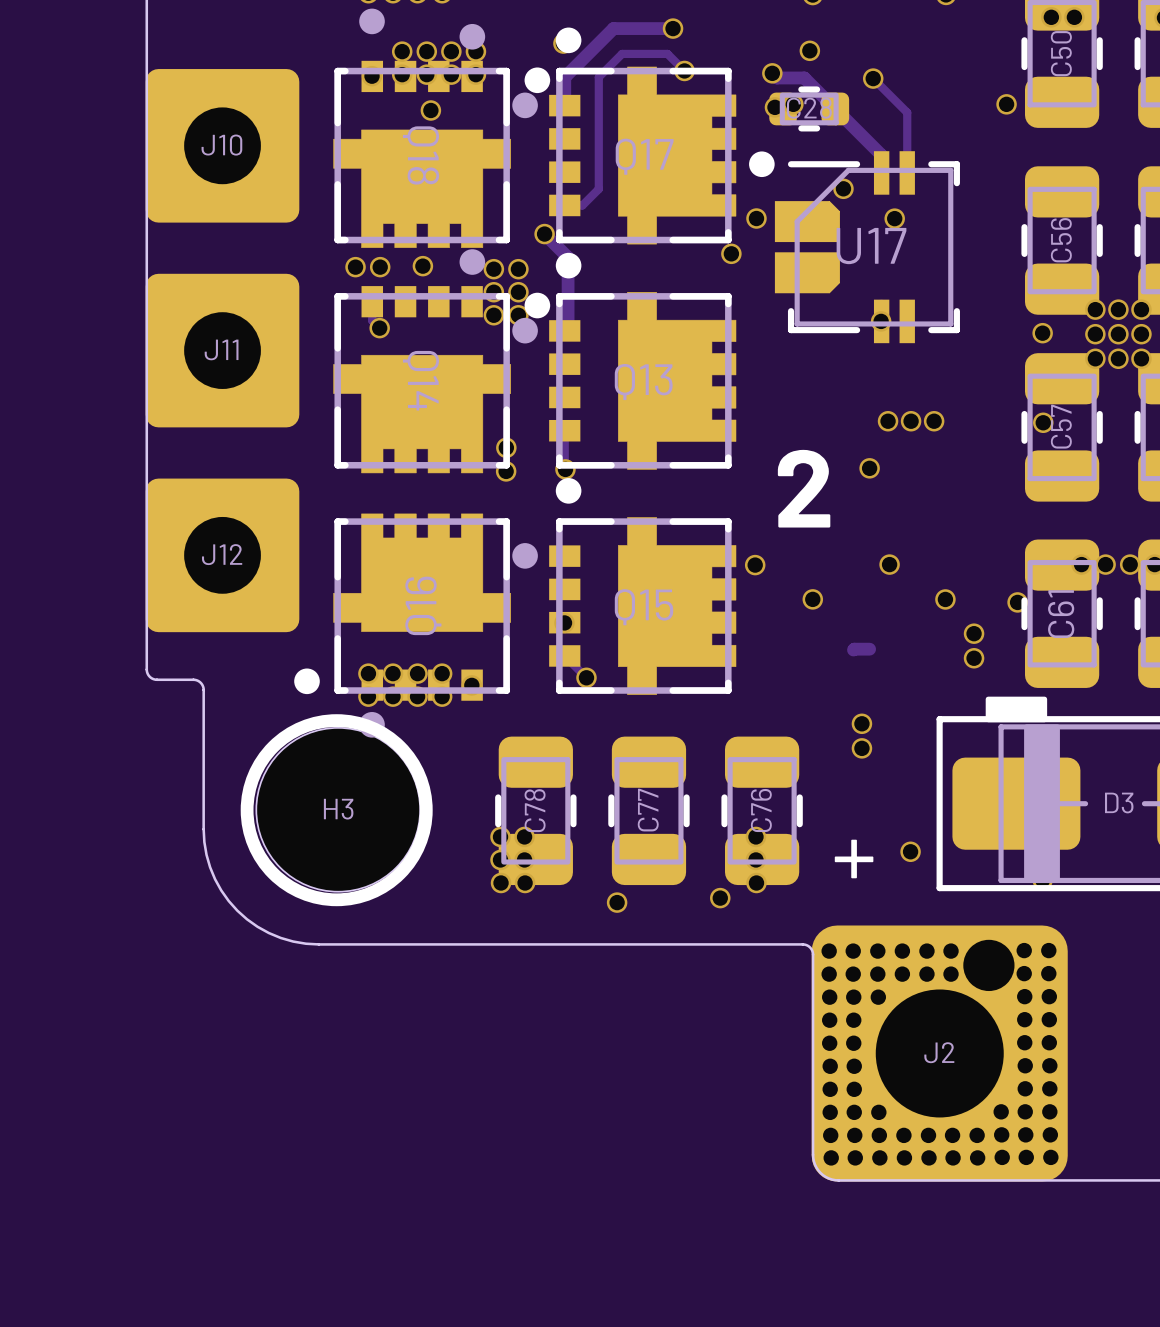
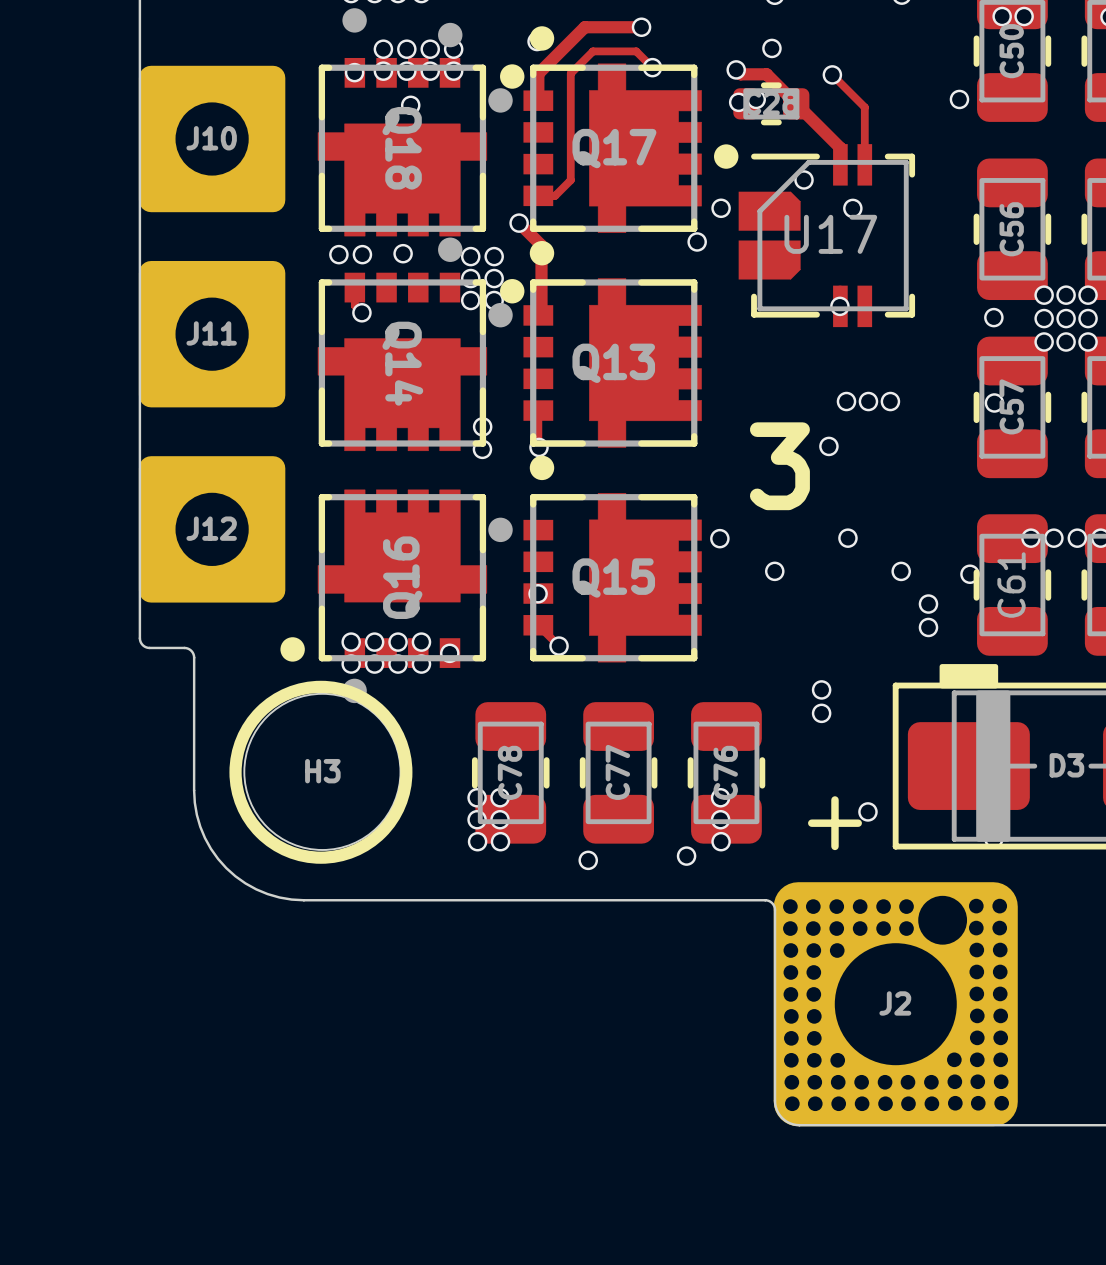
text: 2 (804, 488) -> 3 (779, 466)
track: (869, 649) (853, 650) -> none

